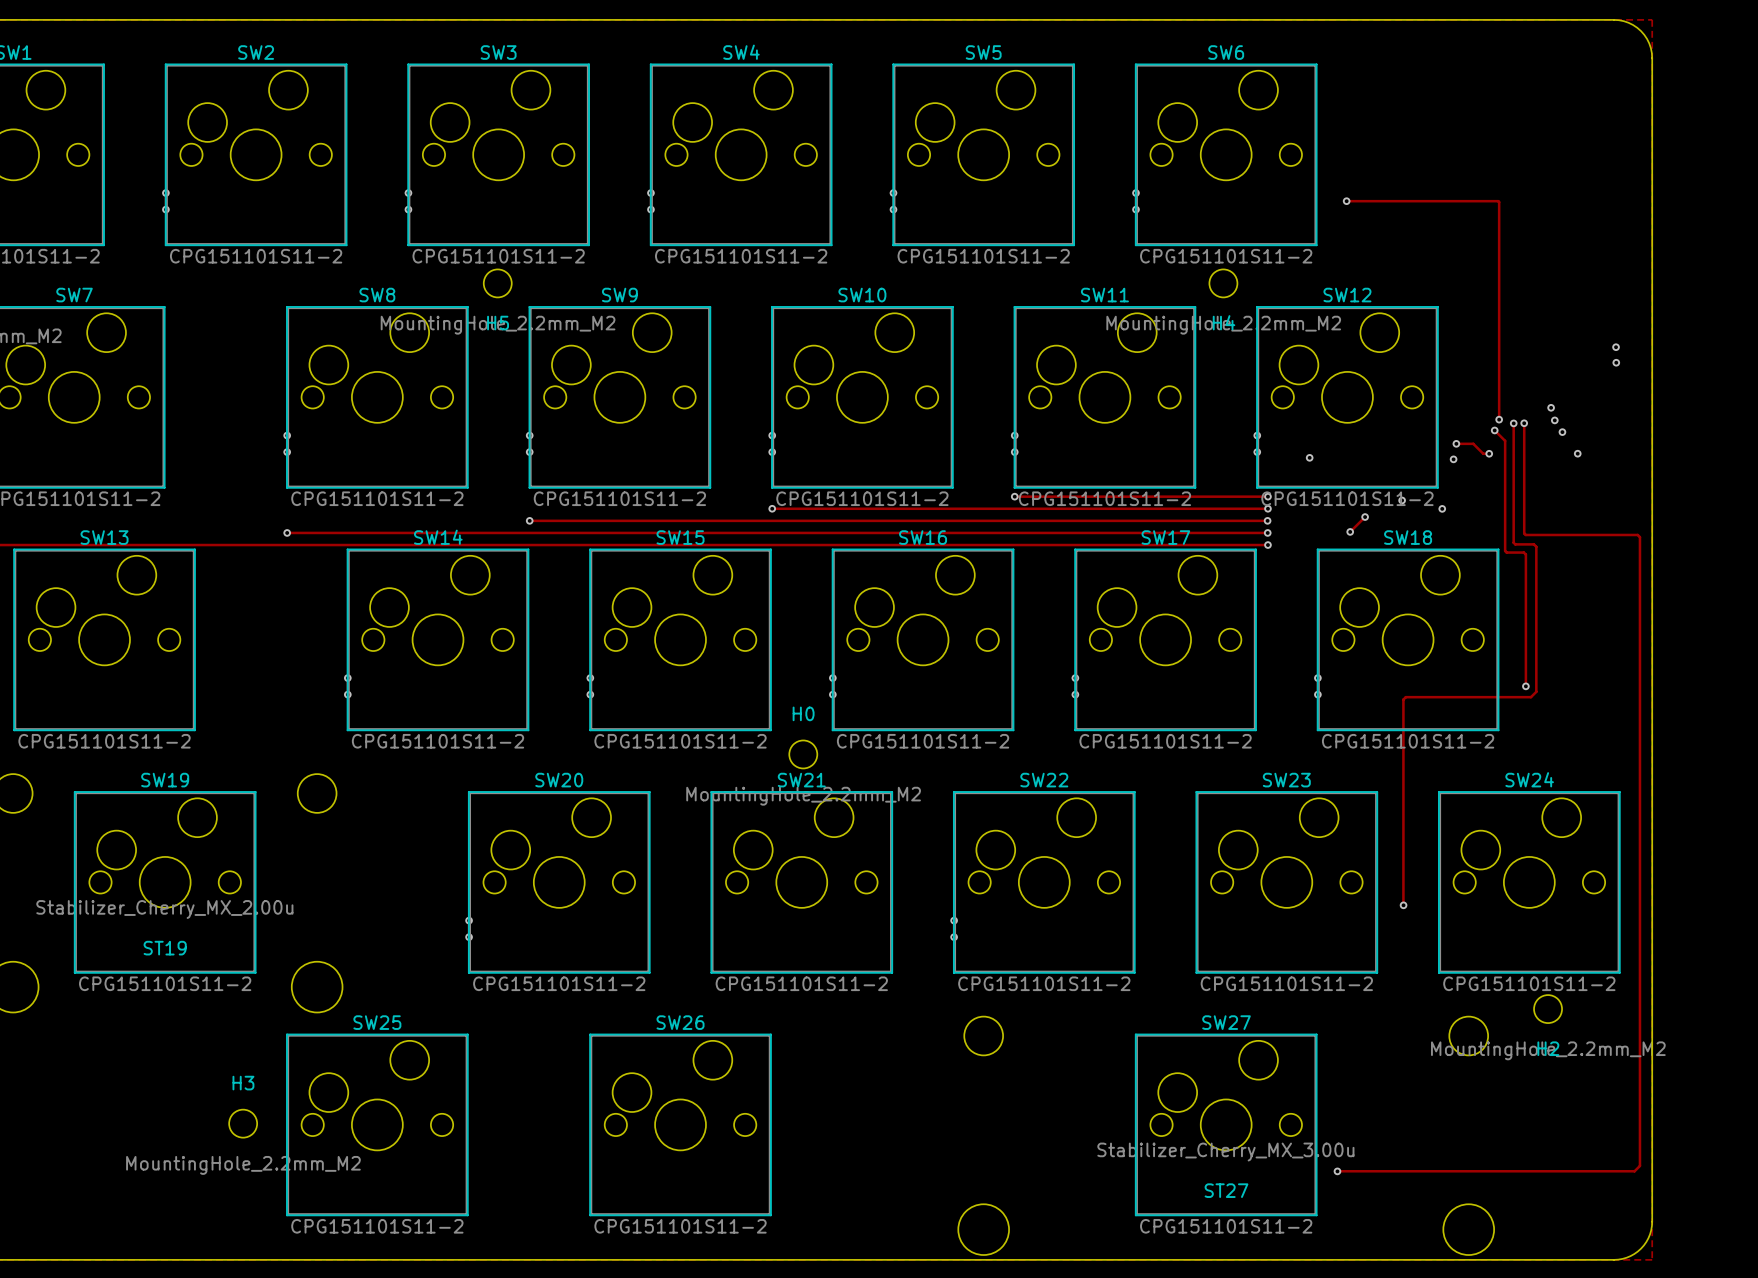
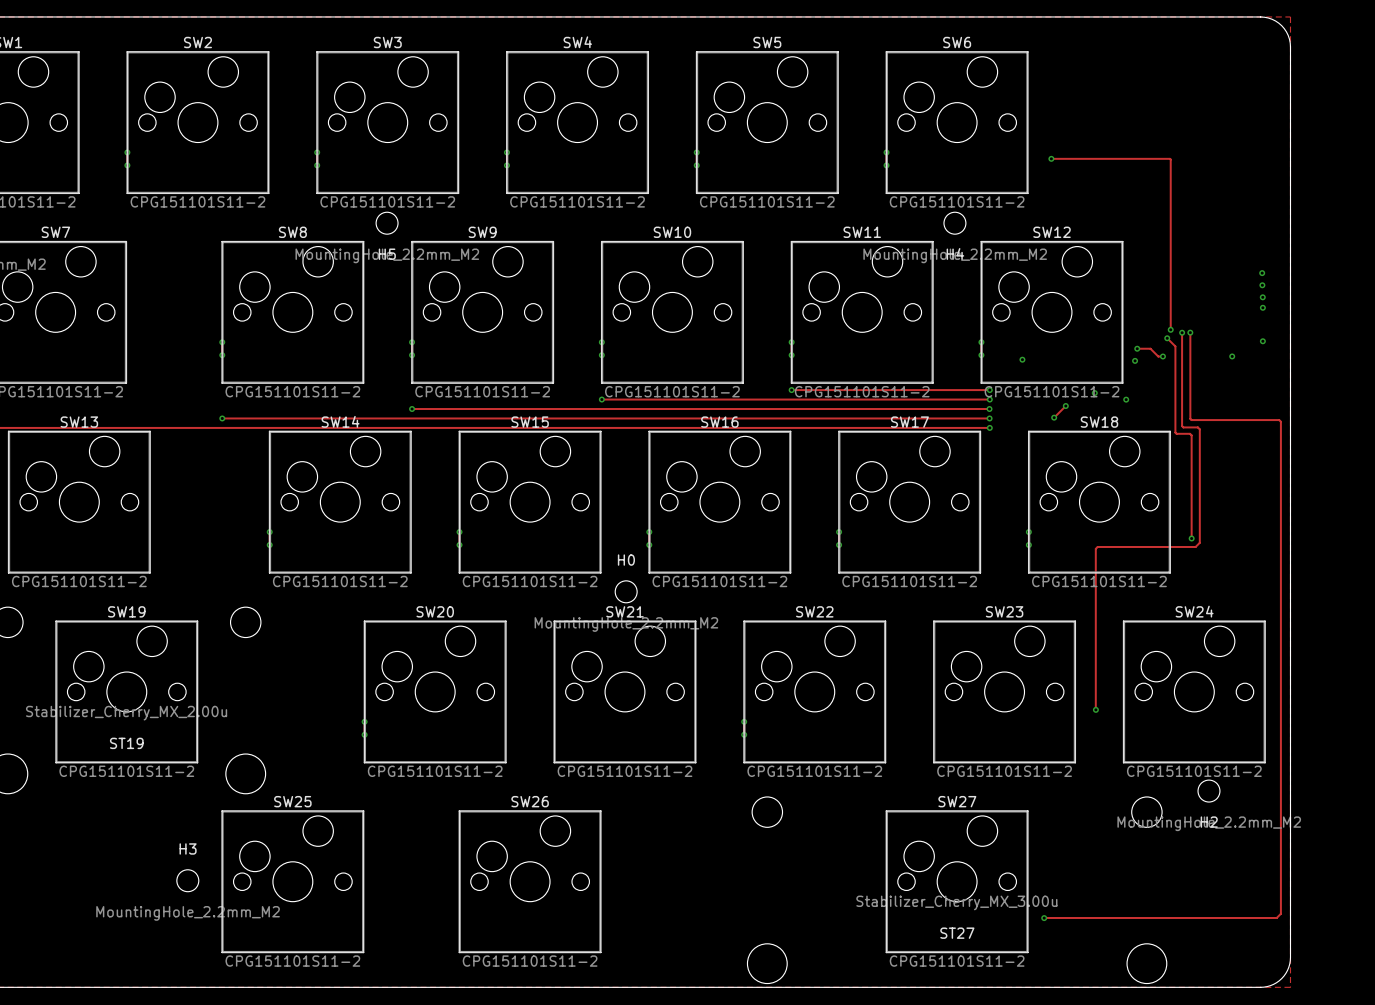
via: none -> (1262, 297)
via: none -> (1262, 307)
via: (1551, 407) -> none
via: (1554, 420) -> none
via: (1562, 432) -> none
via: none -> (1262, 341)

